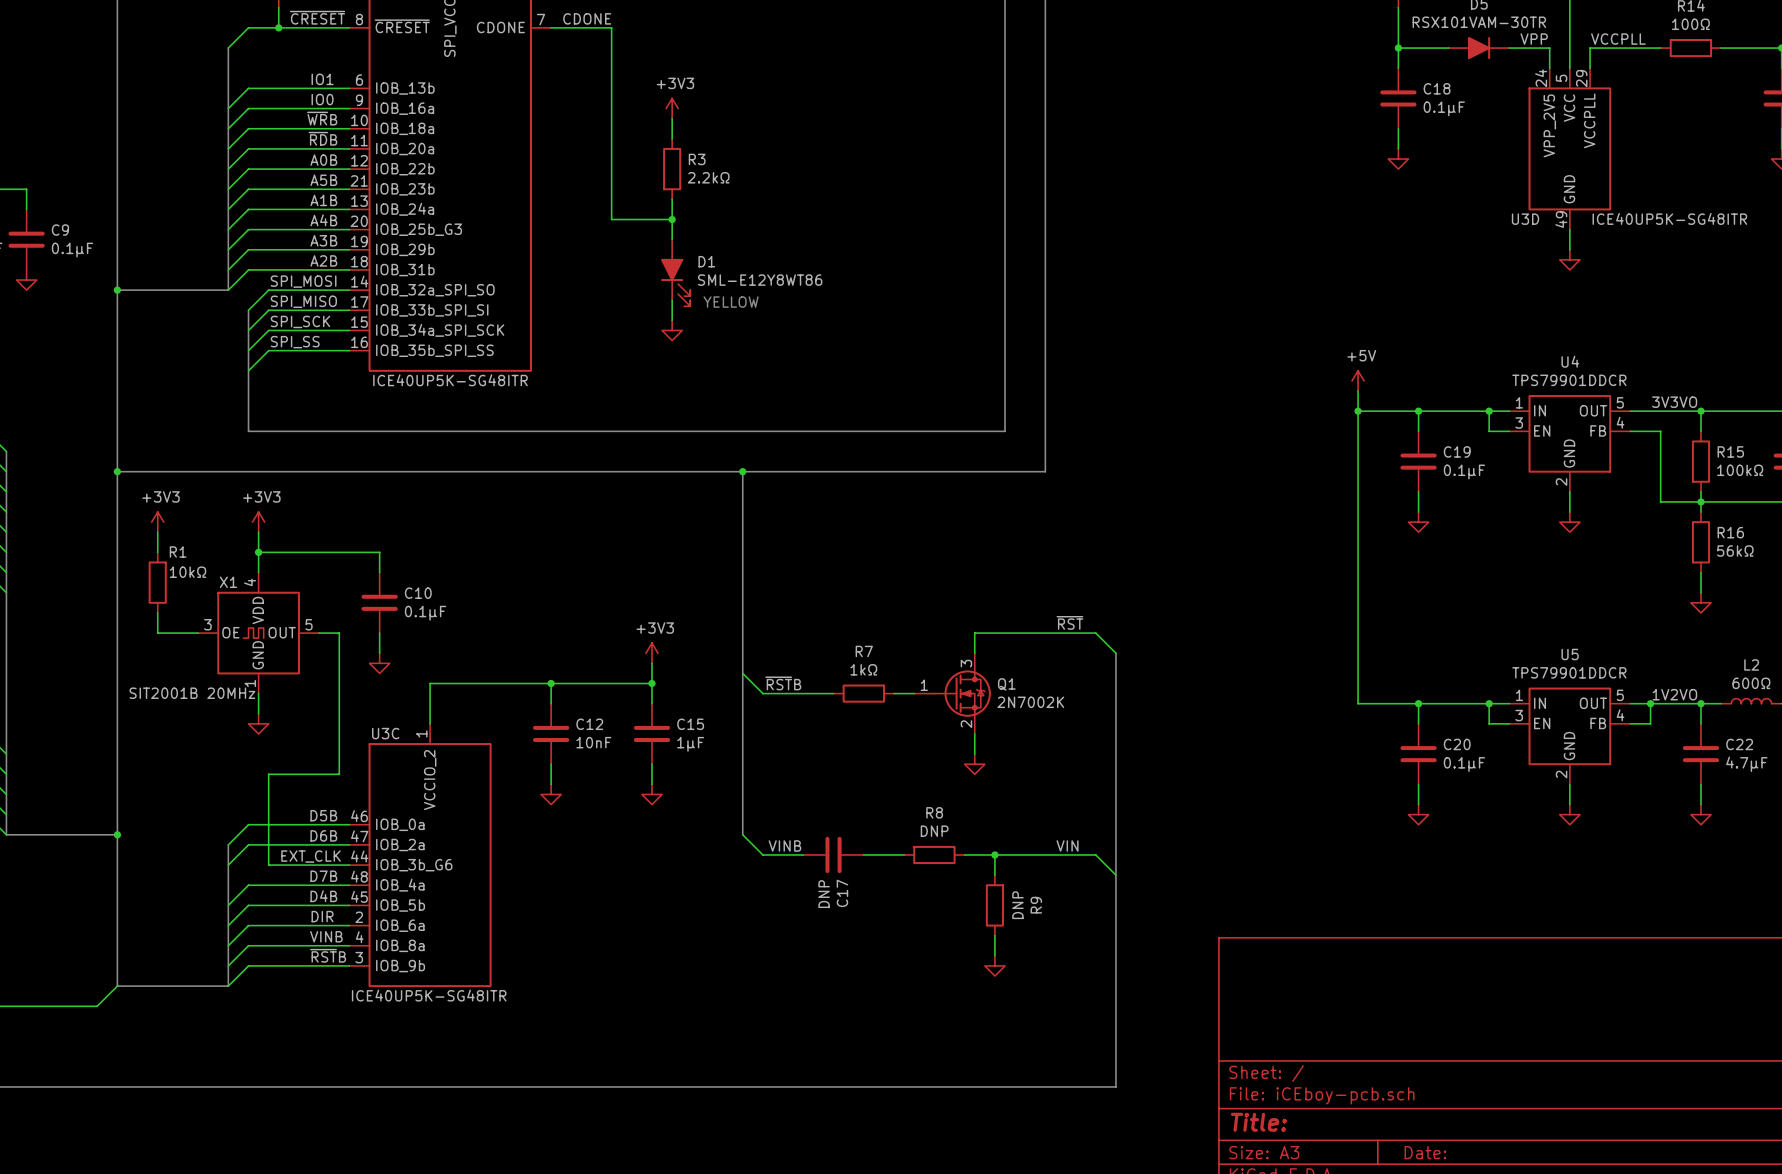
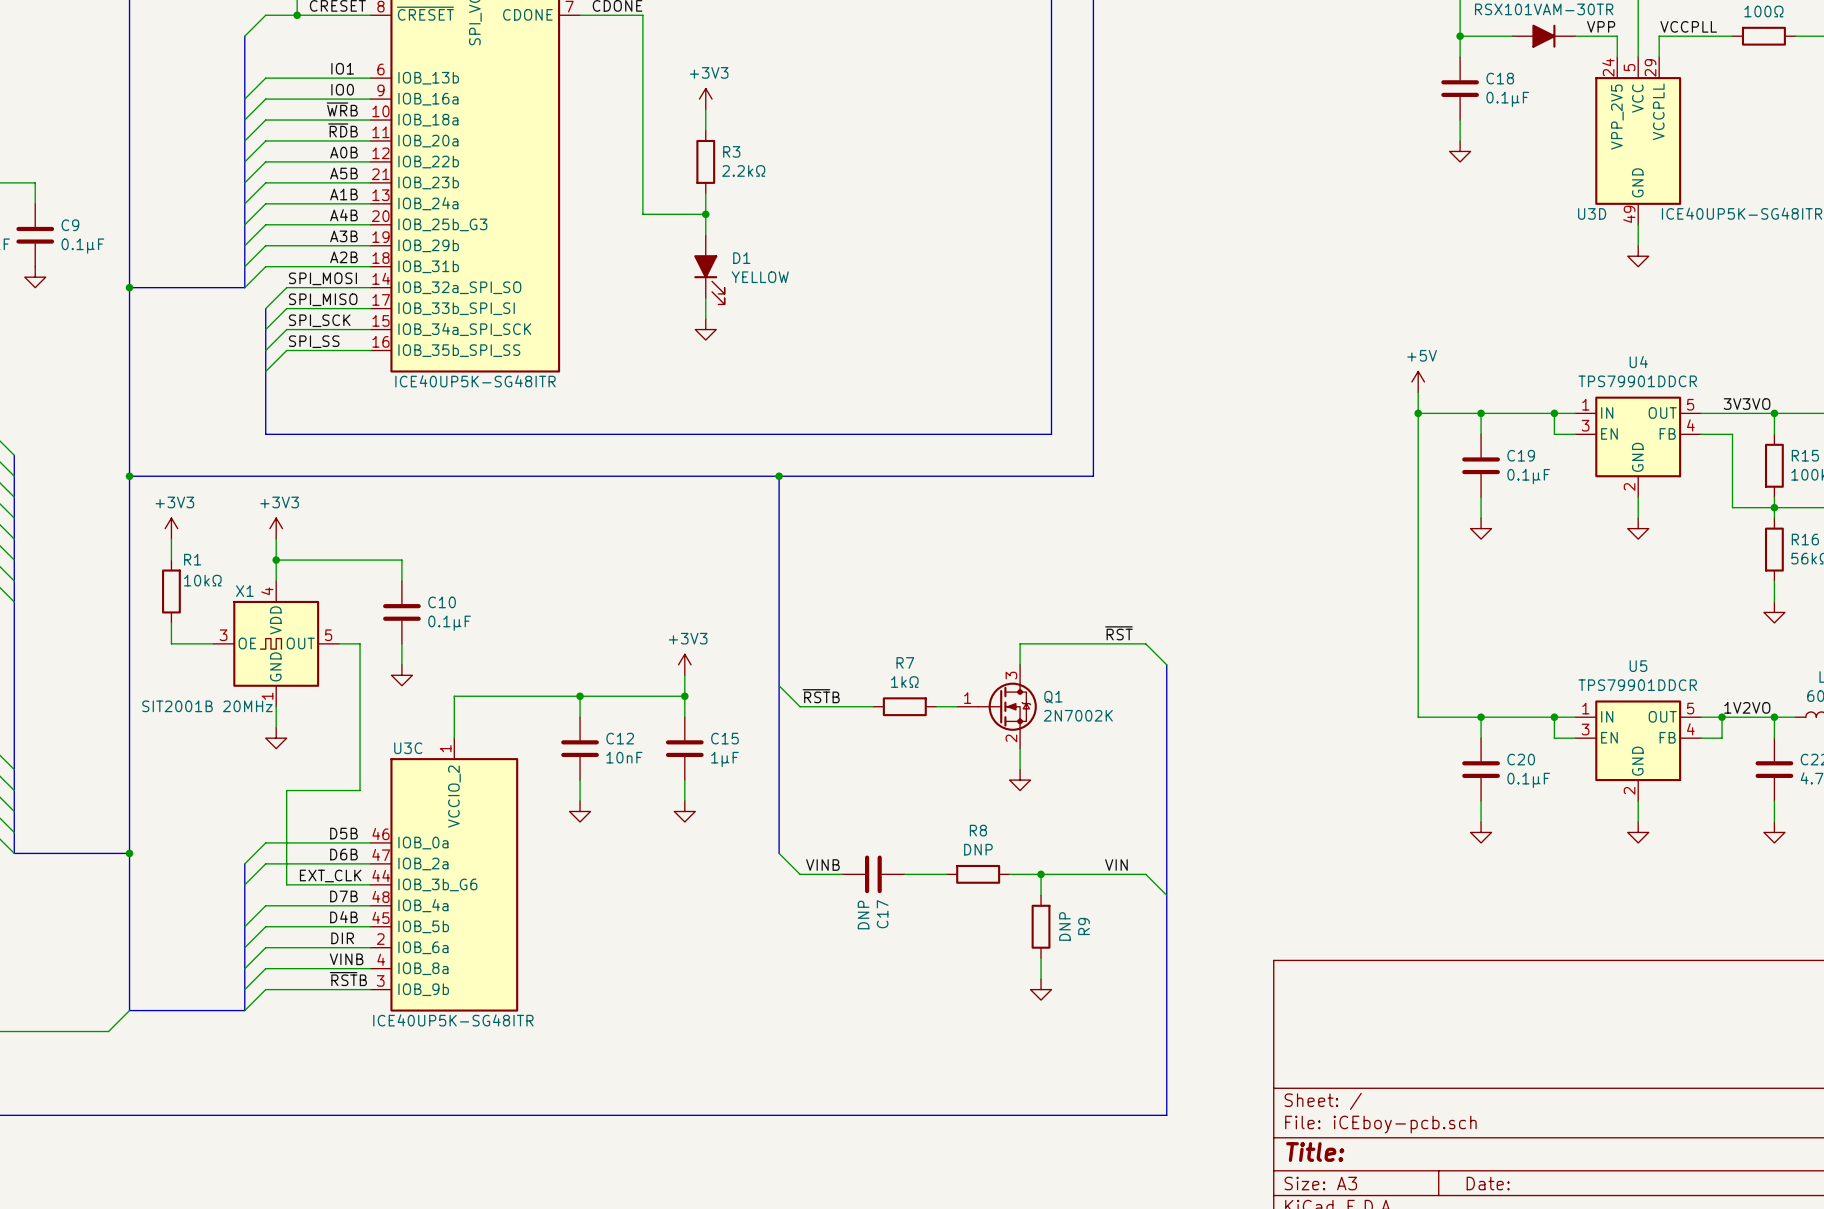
D1 value: SML-E12Y8WT86 (760, 280) -> YELLOW (760, 277)
text: YELLOW (731, 302) -> none

